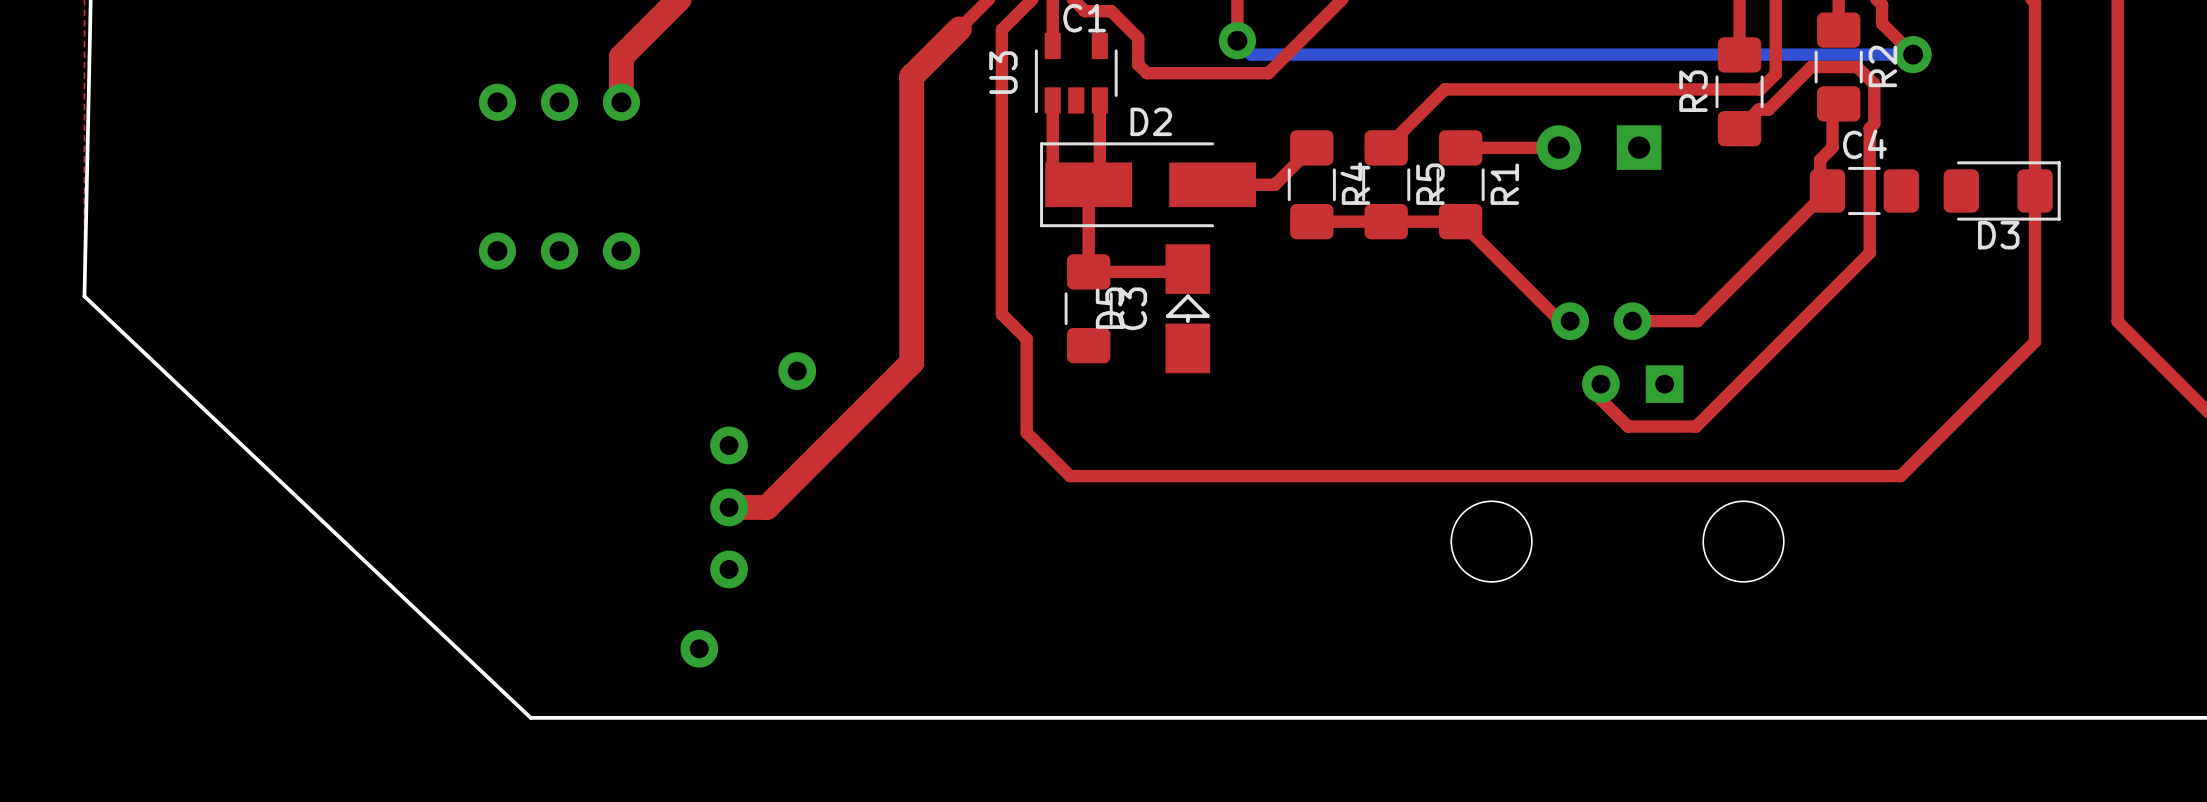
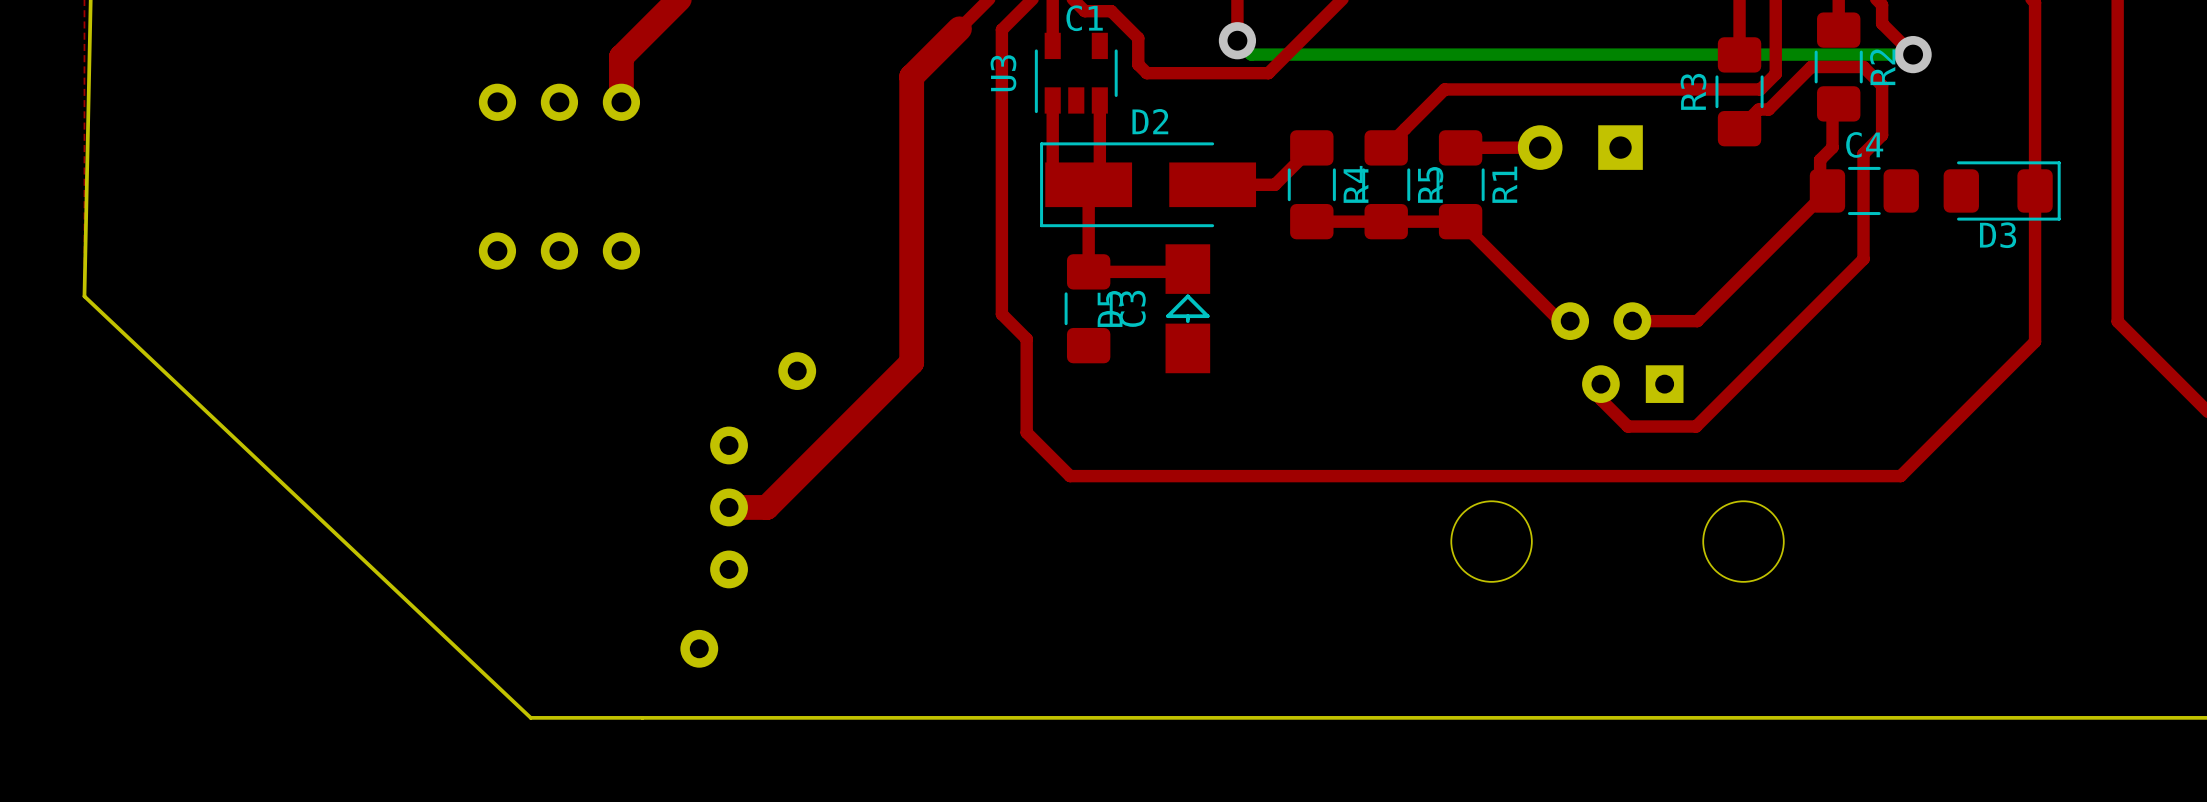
top track: (1857, 67) (1874, 84) (1874, 123) (1869, 128) (1869, 252) (1863, 259) -> (1857, 67) (1863, 67) (1882, 85) (1882, 135) (1863, 153) (1863, 259)
top track: (1460, 147) (1558, 147) -> (1460, 147) (1540, 147)
part position: (1598, 147) -> (1580, 147)

